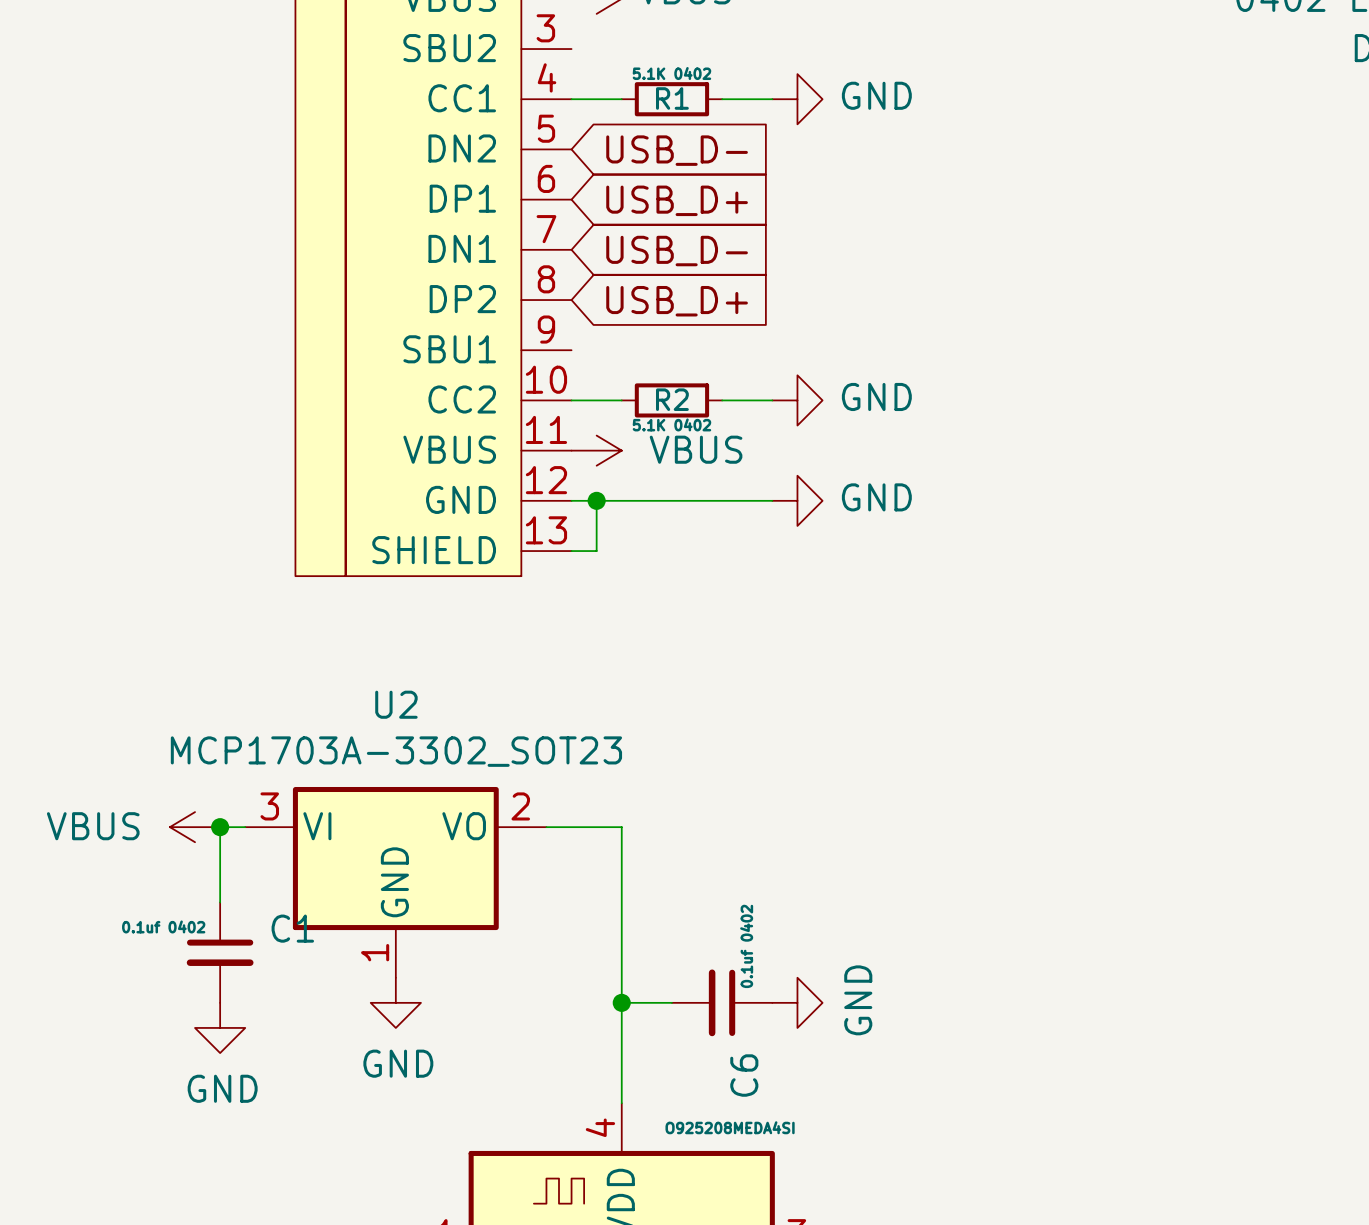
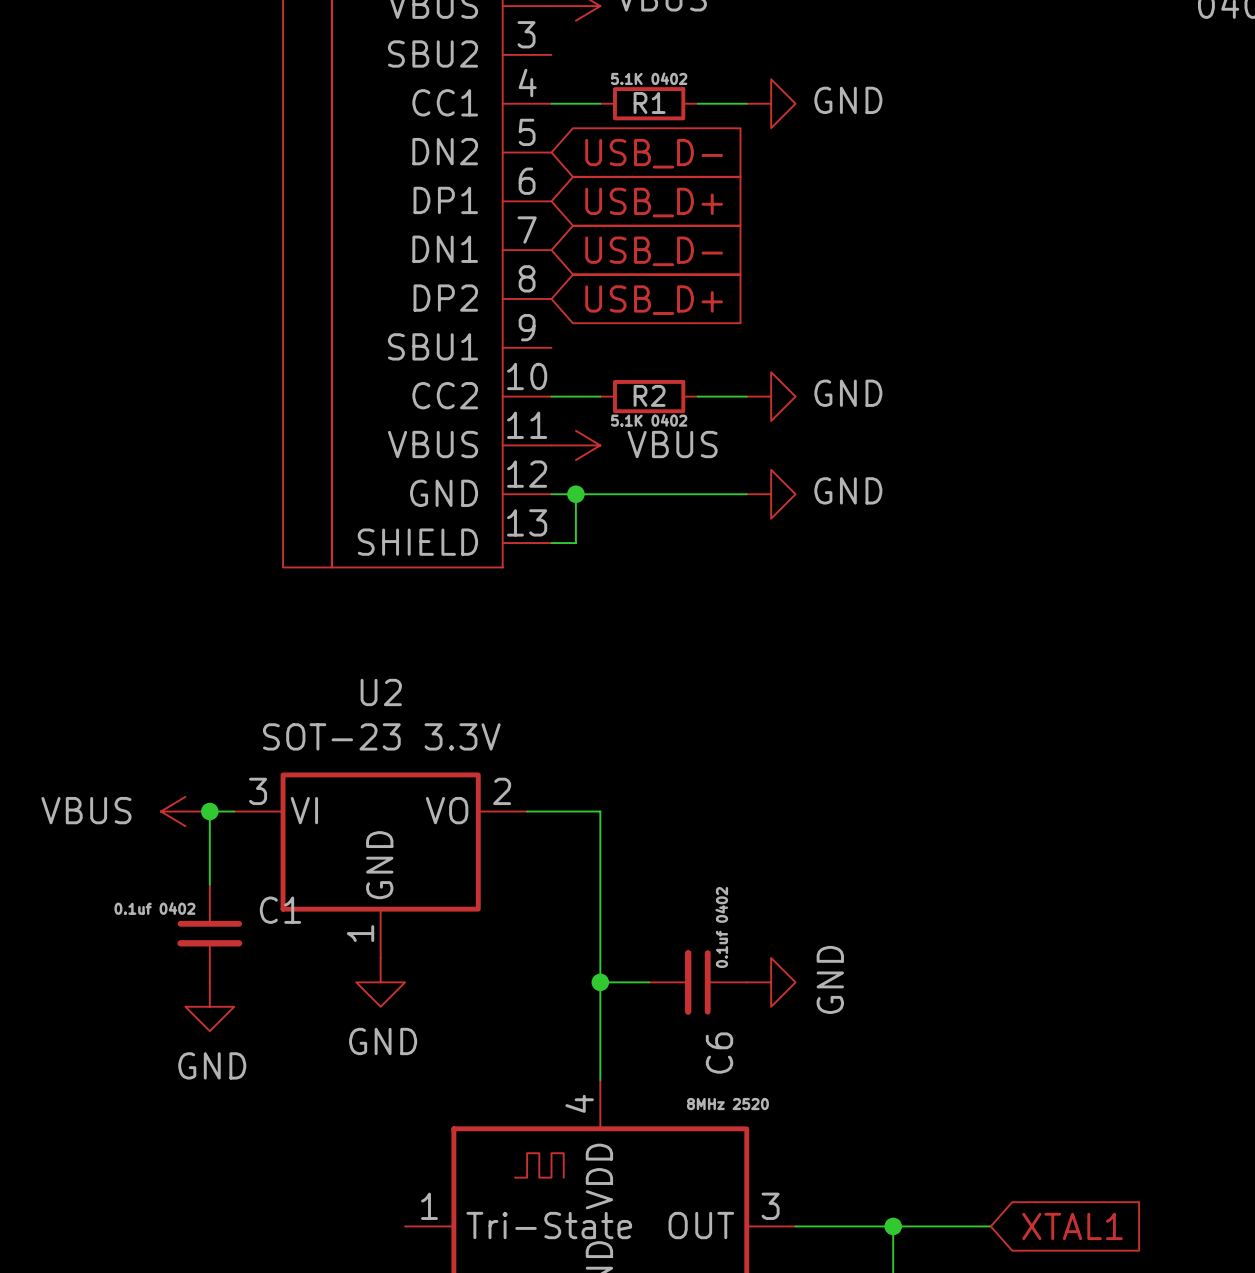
U2 value: MCP1703A-3302_SOT23 (396, 751) -> SOT-23 3.3V (381, 736)
part value: O925208MEDA4SI (730, 1127) -> 8MHz 2520 (727, 1104)

